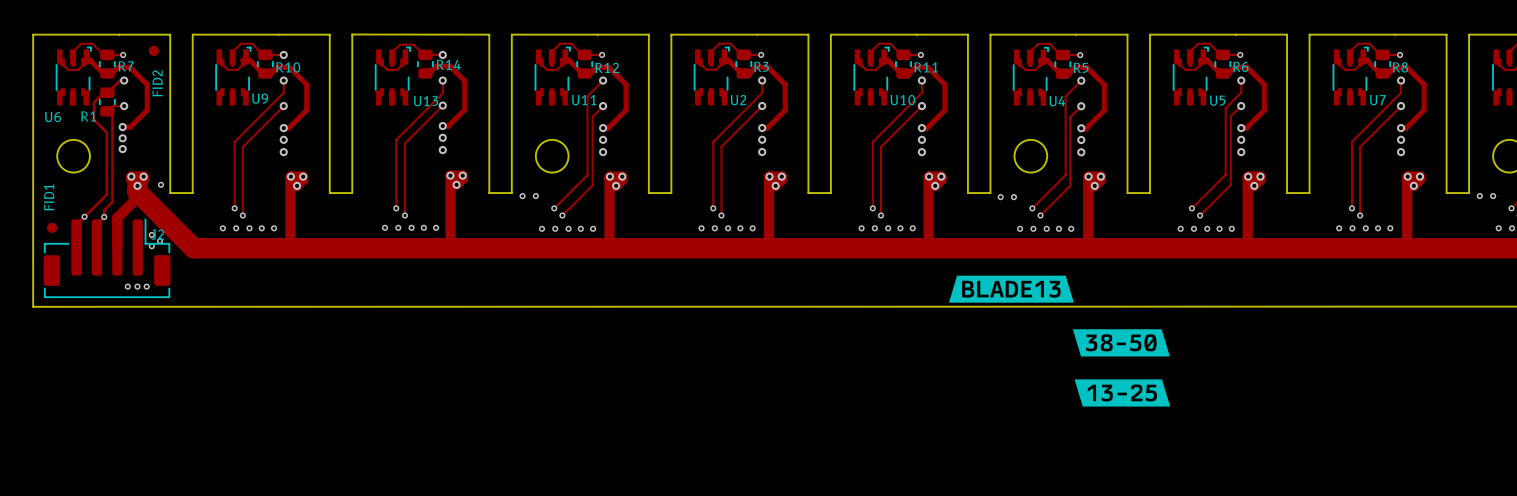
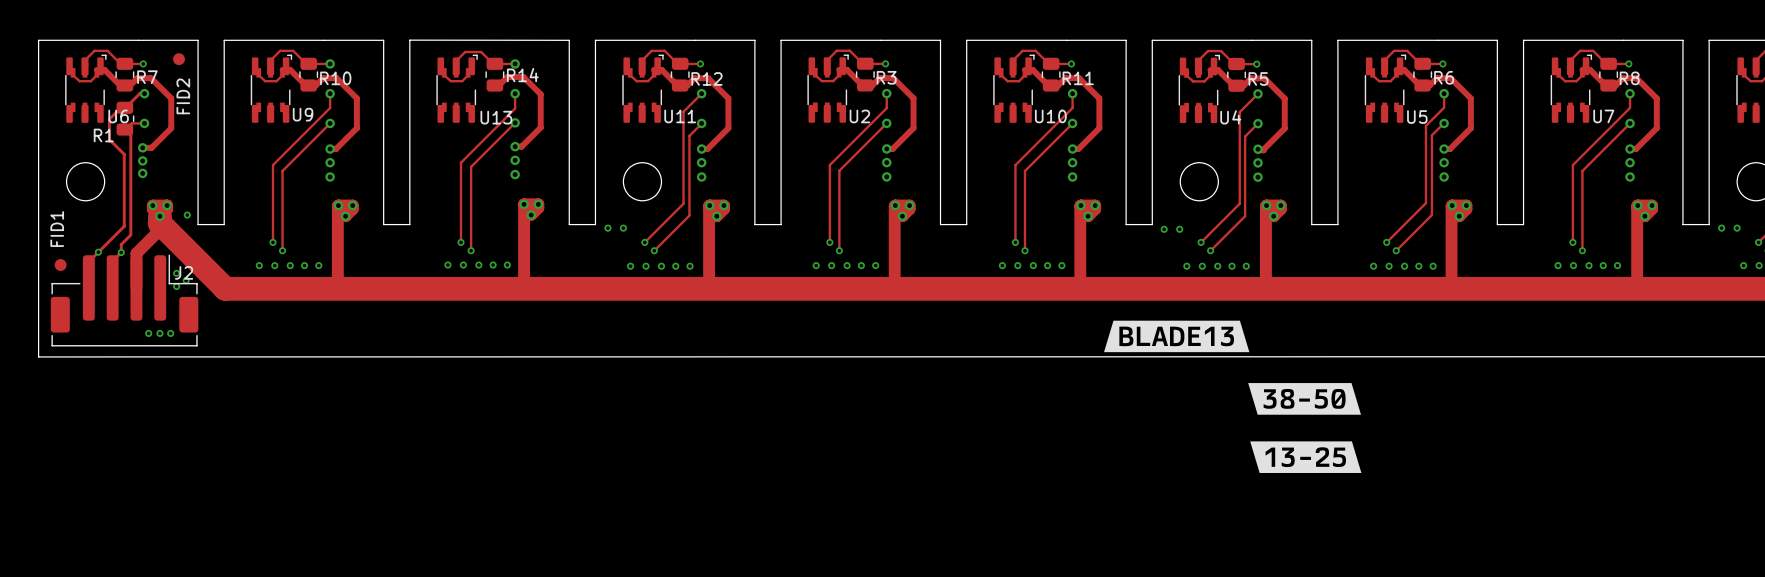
U6 name position: U6 (53, 117) -> U6 (118, 116)

